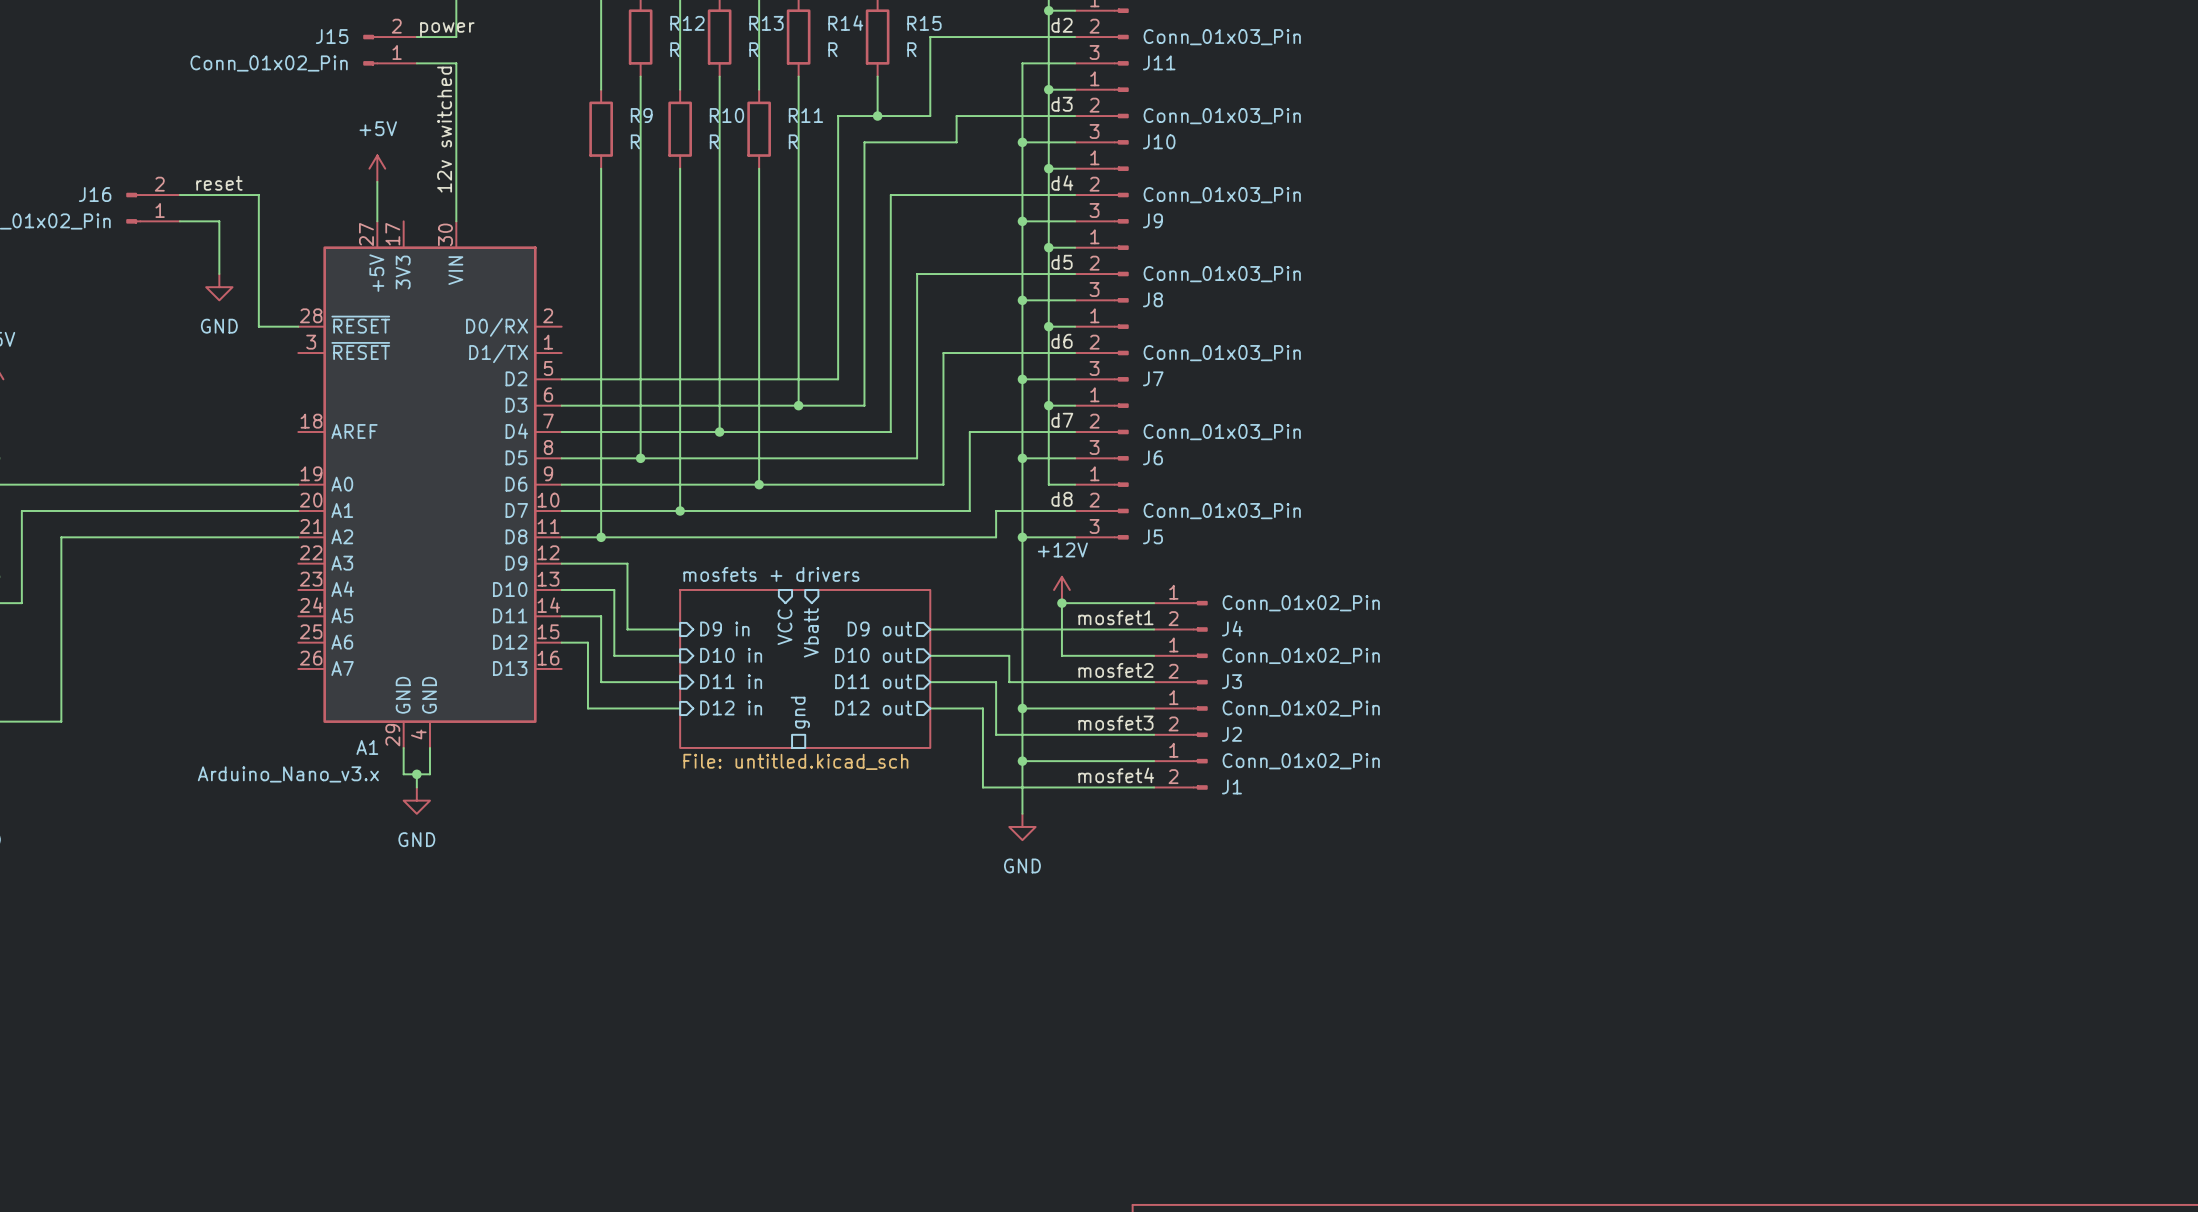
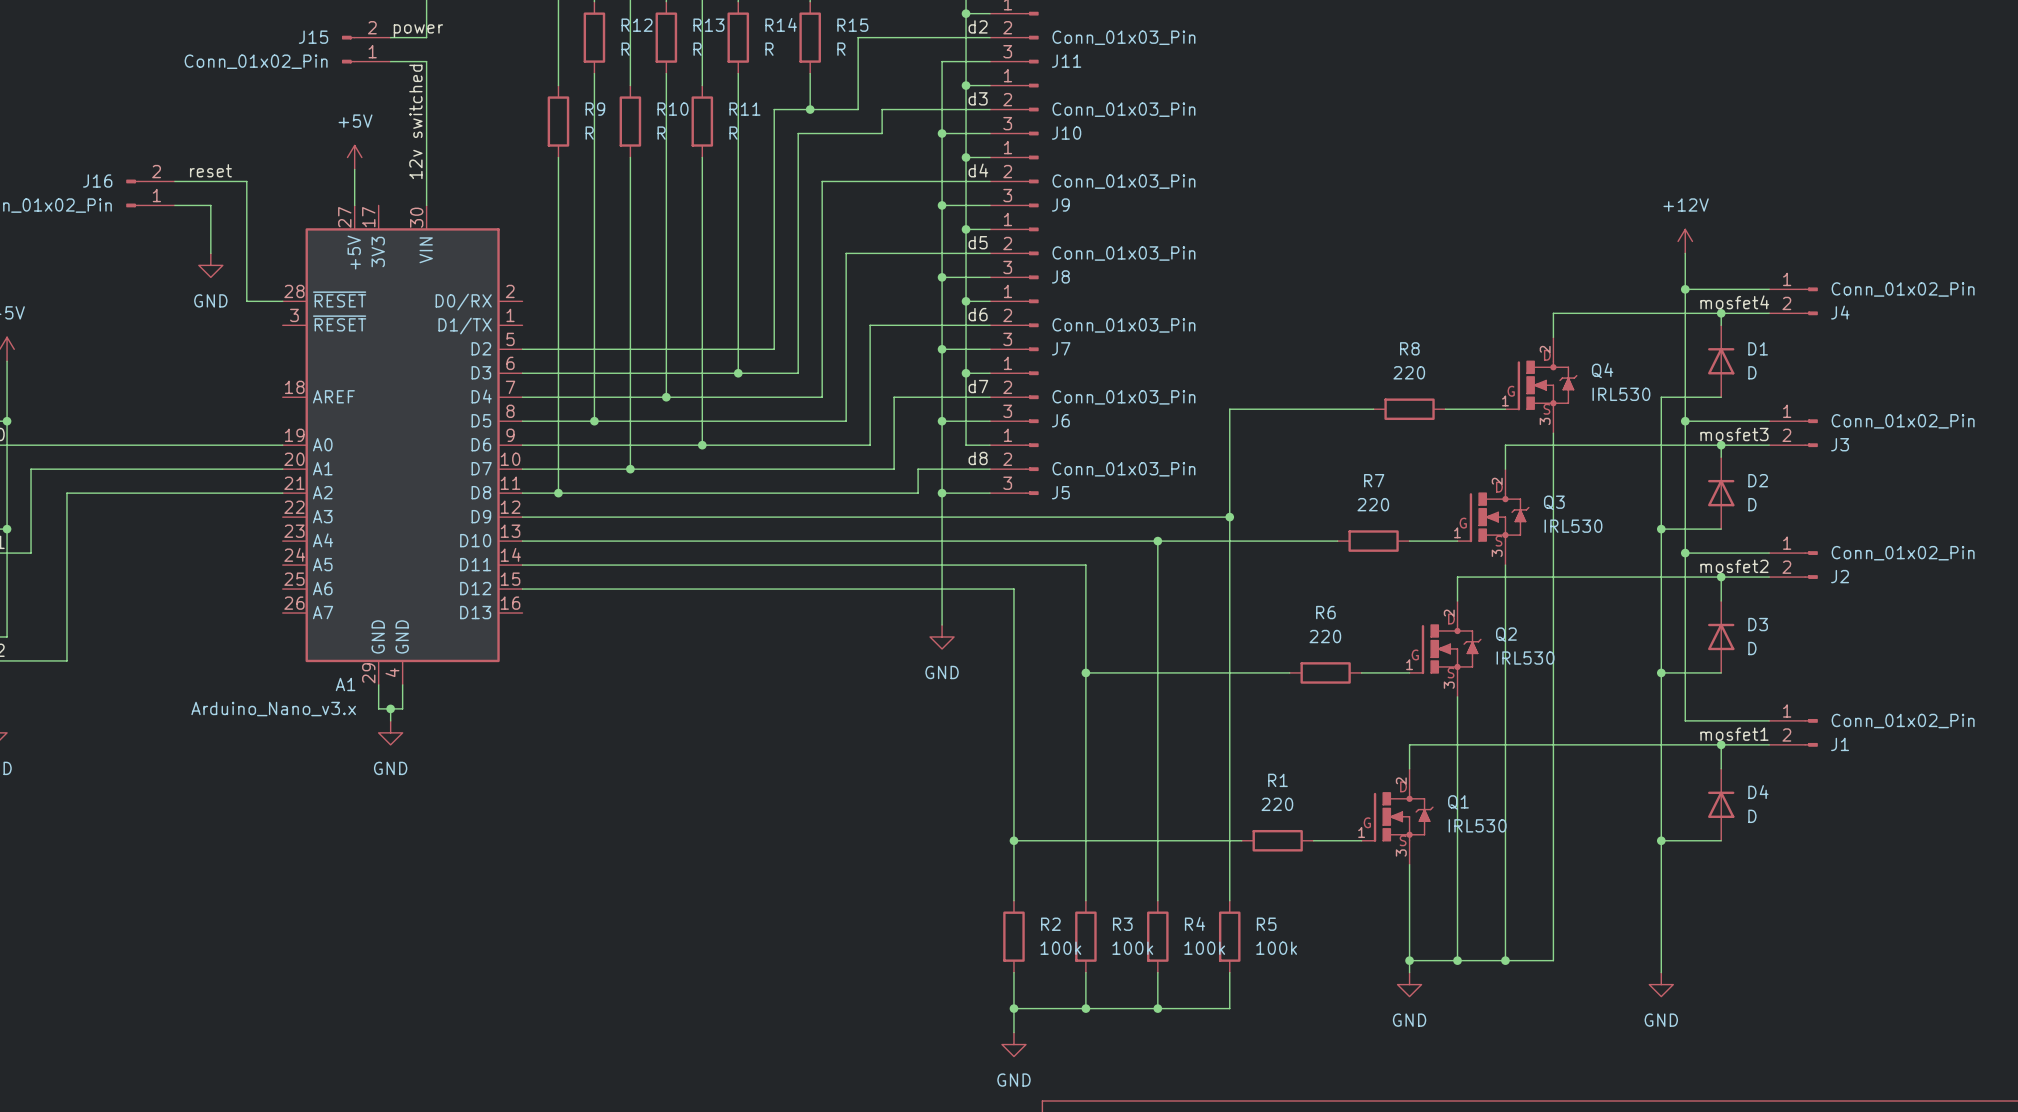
power symbol: none -> +12V (1685, 241)
wire: none -> (1685, 253) (1685, 720) (1769, 720)
wire: none -> (1685, 289) (1769, 289)
junction: none -> (1685, 289)
label: none -> mosfet4 (1734, 302)
wire: none -> (1721, 313) (1721, 325)
junction: none -> (1721, 313)
wire: none -> (1769, 313) (1553, 313) (1553, 337)
D1: none -> D (1721, 361)
Q4: none -> IRL530 (1541, 385)
wire: none -> (1721, 397) (1661, 397) (1661, 972)
wire: none -> (1373, 409) (1229, 409) (1229, 900)
R8: none -> 220 (1409, 409)
wire: none -> (1445, 409) (1505, 409)
wire: none -> (1685, 421) (1769, 421)
junction: none -> (1685, 421)
wire: none -> (1553, 433) (1553, 960) (1409, 960)
label: none -> mosfet3 (1734, 434)
wire: none -> (1721, 445) (1721, 457)
junction: none -> (1721, 445)
wire: none -> (1769, 445) (1505, 445) (1505, 469)
D2: none -> D (1721, 493)
wire: (627, 563) (627, 629) (680, 629) -> (582, 517) (1229, 517)
junction: none -> (1229, 517)
Q3: none -> IRL530 (1493, 517)
wire: none -> (1661, 529) (1721, 529)
junction: none -> (1661, 529)
wire: (614, 589) (614, 655) (680, 655) -> (570, 541) (1337, 541)
power symbol: +12V (1061, 589) -> none
wire: none -> (1157, 541) (1157, 900)
junction: none -> (1157, 541)
R7: none -> 220 (1373, 541)
wire: none -> (1409, 541) (1457, 541)
junction: (1061, 603) -> none
wire: (1154, 603) (1061, 603) (1061, 655) (1154, 655) -> none
wire: none -> (1685, 553) (1769, 553)
junction: none -> (1685, 553)
wire: (601, 616) (601, 682) (680, 682) -> (558, 565) (1085, 565) (1085, 900)
J4 position: (1180, 616) -> (1793, 301)
wire: none -> (1505, 565) (1505, 960)
label: mosfet1 (1115, 617) -> none
label: none -> mosfet2 (1734, 566)
sheet pin: VCC (784, 627) -> none
sheet pin: D9 in (724, 628) -> none
sheet pin: D9 out (879, 628) -> none
wire: (930, 629) (1154, 629) -> none
wire: none -> (1721, 577) (1721, 601)
junction: none -> (1721, 577)
wire: none -> (1769, 577) (1457, 577) (1457, 601)
sheet pin: Vbatt (811, 632) -> none
wire: (587, 642) (587, 708) (680, 708) -> (546, 589) (1013, 589) (1013, 900)
sheet pin: D10 in (731, 655) -> none
sheet pin: D10 out (873, 655) -> none
wire: (930, 655) (1009, 655) (1009, 682) (1154, 682) -> none
sheet mosfets + drivers: File: untitled.kicad_sch (805, 668) -> none
J3 position: (1180, 668) -> (1793, 433)
label: mosfet2 (1115, 670) -> none
sheet pin: D11 in (731, 681) -> none
sheet pin: D11 out (873, 681) -> none
wire: (930, 682) (996, 682) (996, 734) (1154, 734) -> none
wire: (1022, 682) (1022, 813) -> none
D3: none -> D (1721, 636)
sheet pin: D12 in (731, 707) -> none
sheet pin: D12 out (873, 707) -> none
wire: (930, 708) (982, 708) (982, 787) (1154, 787) -> none
wire: (1022, 708) (1154, 708) -> none
junction: (1022, 708) -> none
Q2: none -> IRL530 (1445, 648)
sheet pin: gnd (800, 712) -> none
J2 position: (1180, 721) -> (1793, 565)
label: mosfet3 (1115, 723) -> none
wire: none -> (1085, 672) (1289, 672)
junction: none -> (1085, 672)
R6: none -> 220 (1325, 672)
wire: none -> (1361, 672) (1409, 672)
wire: none -> (1661, 672) (1721, 672)
junction: none -> (1661, 672)
wire: (1022, 761) (1154, 761) -> none
junction: (1022, 761) -> none
wire: none -> (1457, 696) (1457, 960)
J1 position: (1180, 774) -> (1793, 732)
label: mosfet4 (1116, 775) -> none
label: none -> mosfet1 (1734, 734)
wire: none -> (1721, 744) (1721, 768)
junction: none -> (1721, 744)
wire: none -> (1769, 744) (1409, 744) (1409, 768)
power symbol position: GND (1022, 826) -> GND (942, 636)
D4: none -> D (1721, 804)
Q1: none -> IRL530 (1397, 816)
wire: none -> (1013, 840) (1241, 840)
junction: none -> (1013, 840)
R1: none -> 220 (1277, 840)
wire: none -> (1313, 840) (1361, 840)
wire: none -> (1661, 840) (1721, 840)
junction: none -> (1661, 840)
wire: none -> (1409, 864) (1409, 972)
R2: none -> 100k (1013, 936)
R3: none -> 100k (1085, 936)
R4: none -> 100k (1157, 936)
R5: none -> 100k (1229, 936)
junction: none -> (1409, 960)
junction: none -> (1457, 960)
junction: none -> (1505, 960)
wire: none -> (1013, 972) (1013, 1032)
wire: none -> (1085, 972) (1085, 1008)
wire: none -> (1157, 972) (1157, 1008)
wire: none -> (1229, 972) (1229, 1008) (1013, 1008)
power symbol: none -> GND (1409, 984)
power symbol: none -> GND (1661, 984)
junction: none -> (1013, 1008)
junction: none -> (1085, 1008)
junction: none -> (1157, 1008)
power symbol: none -> GND (1013, 1044)

